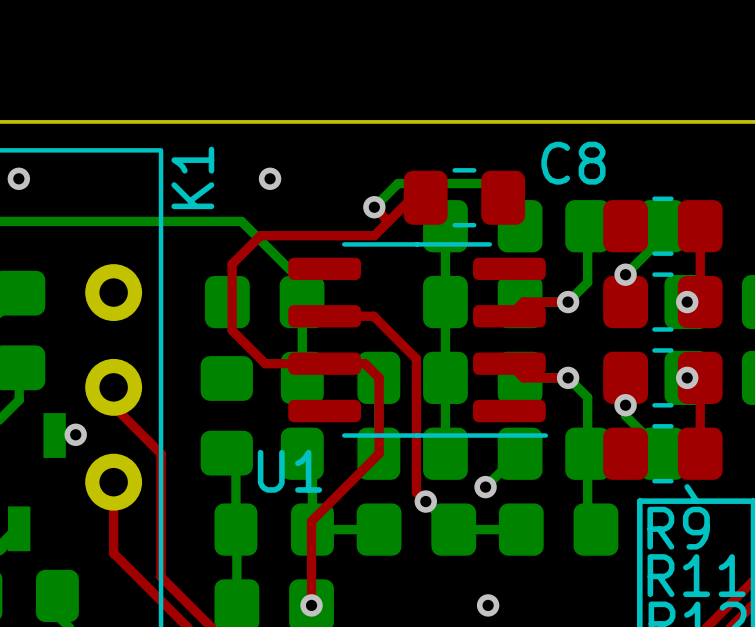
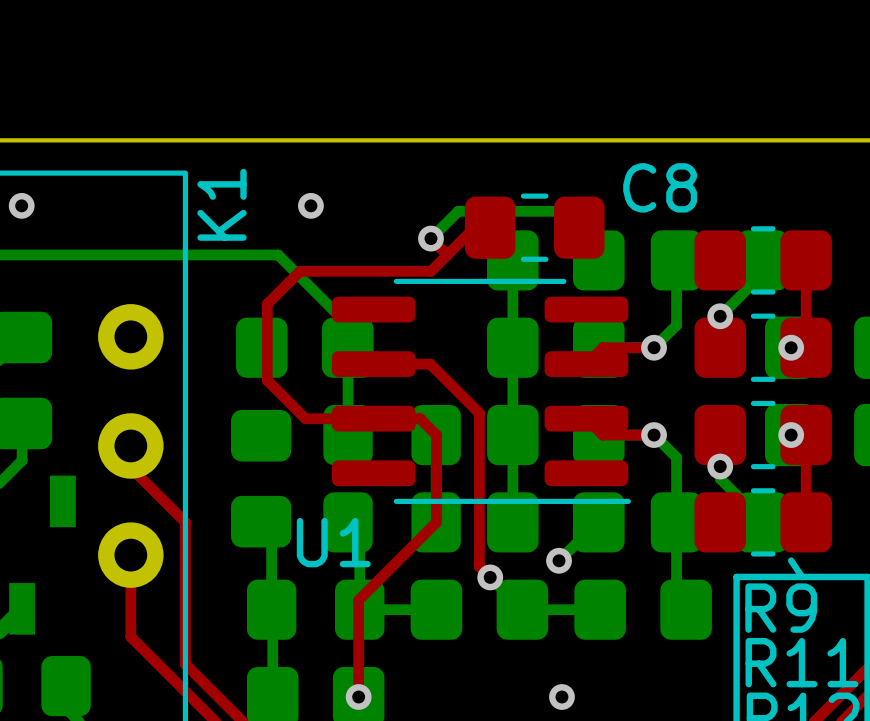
via: (75, 434) -> none

